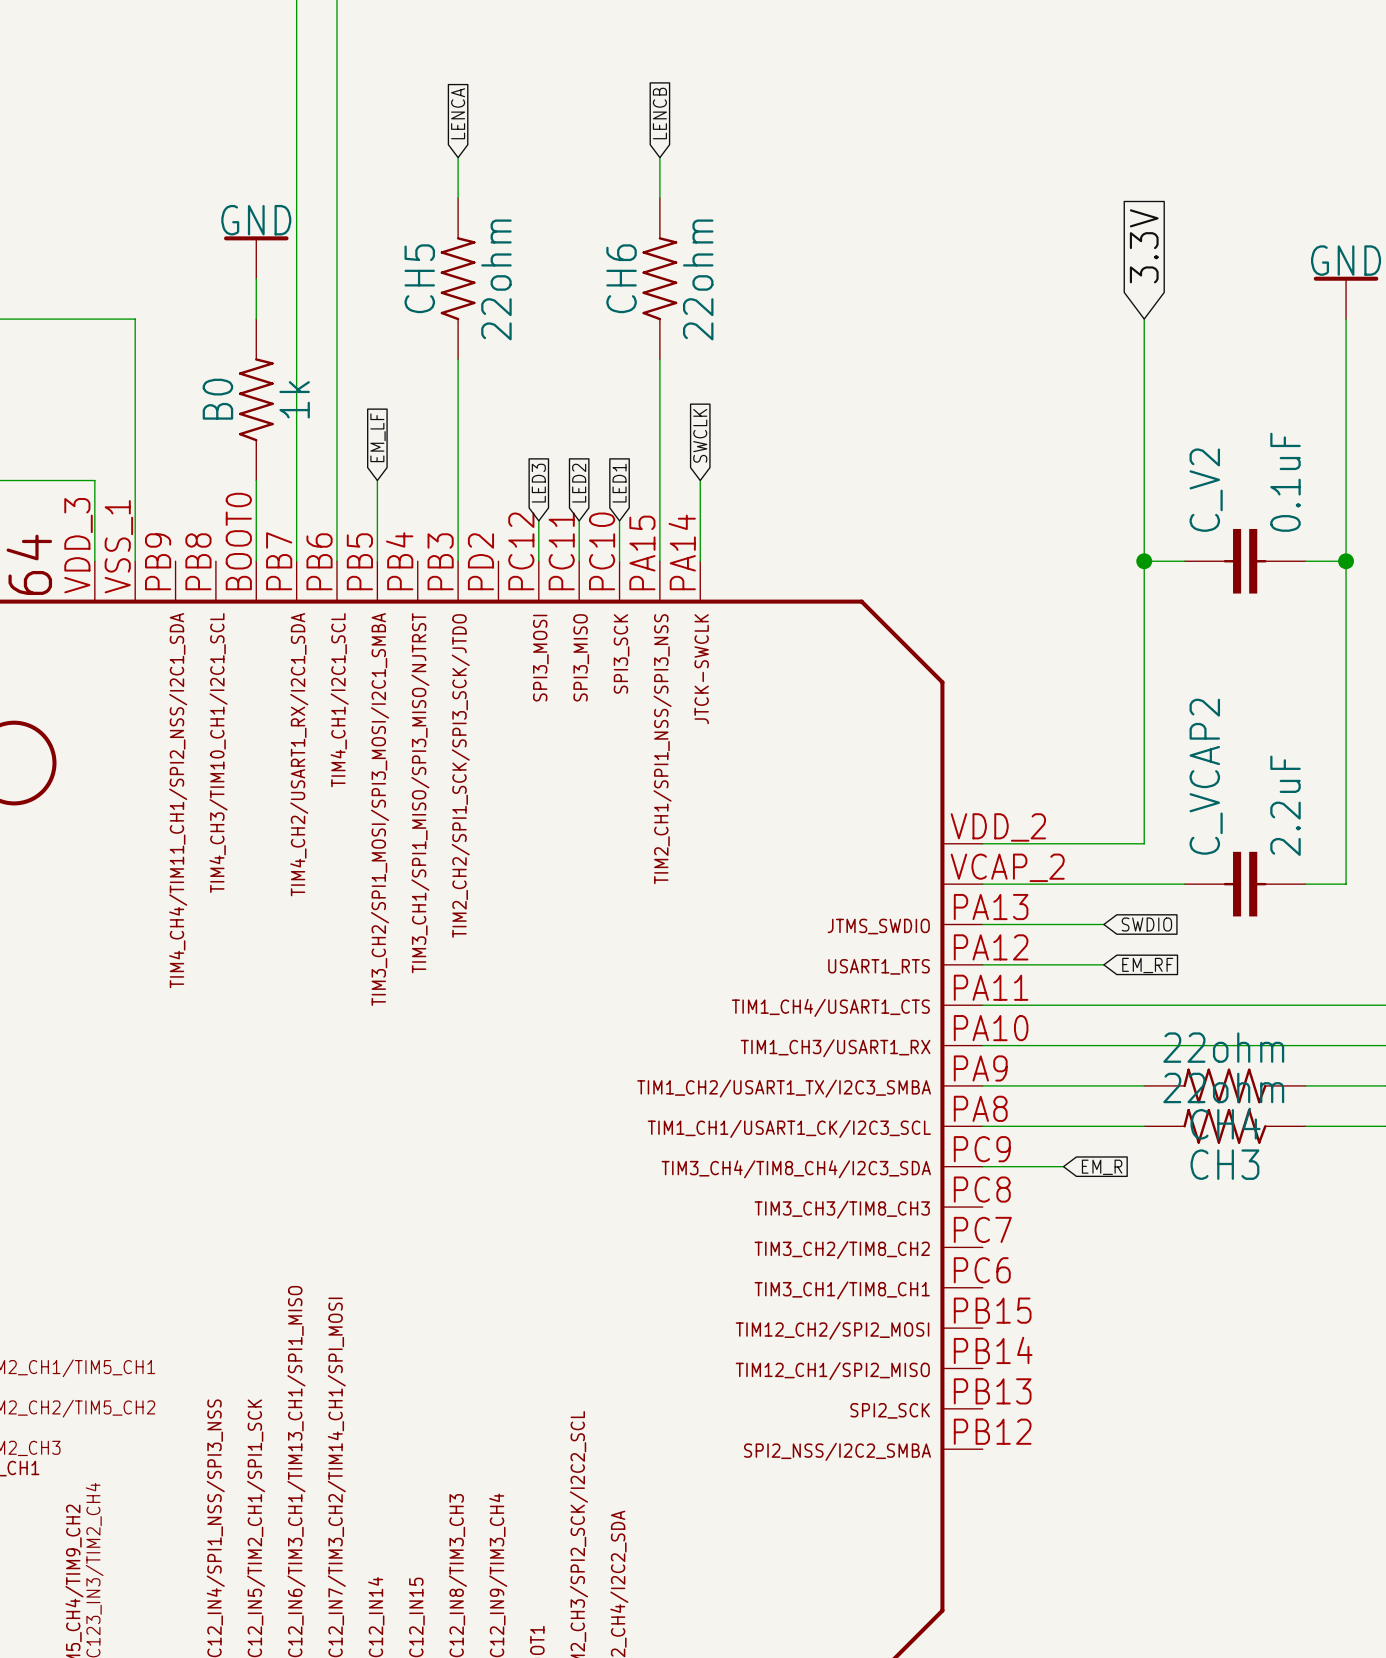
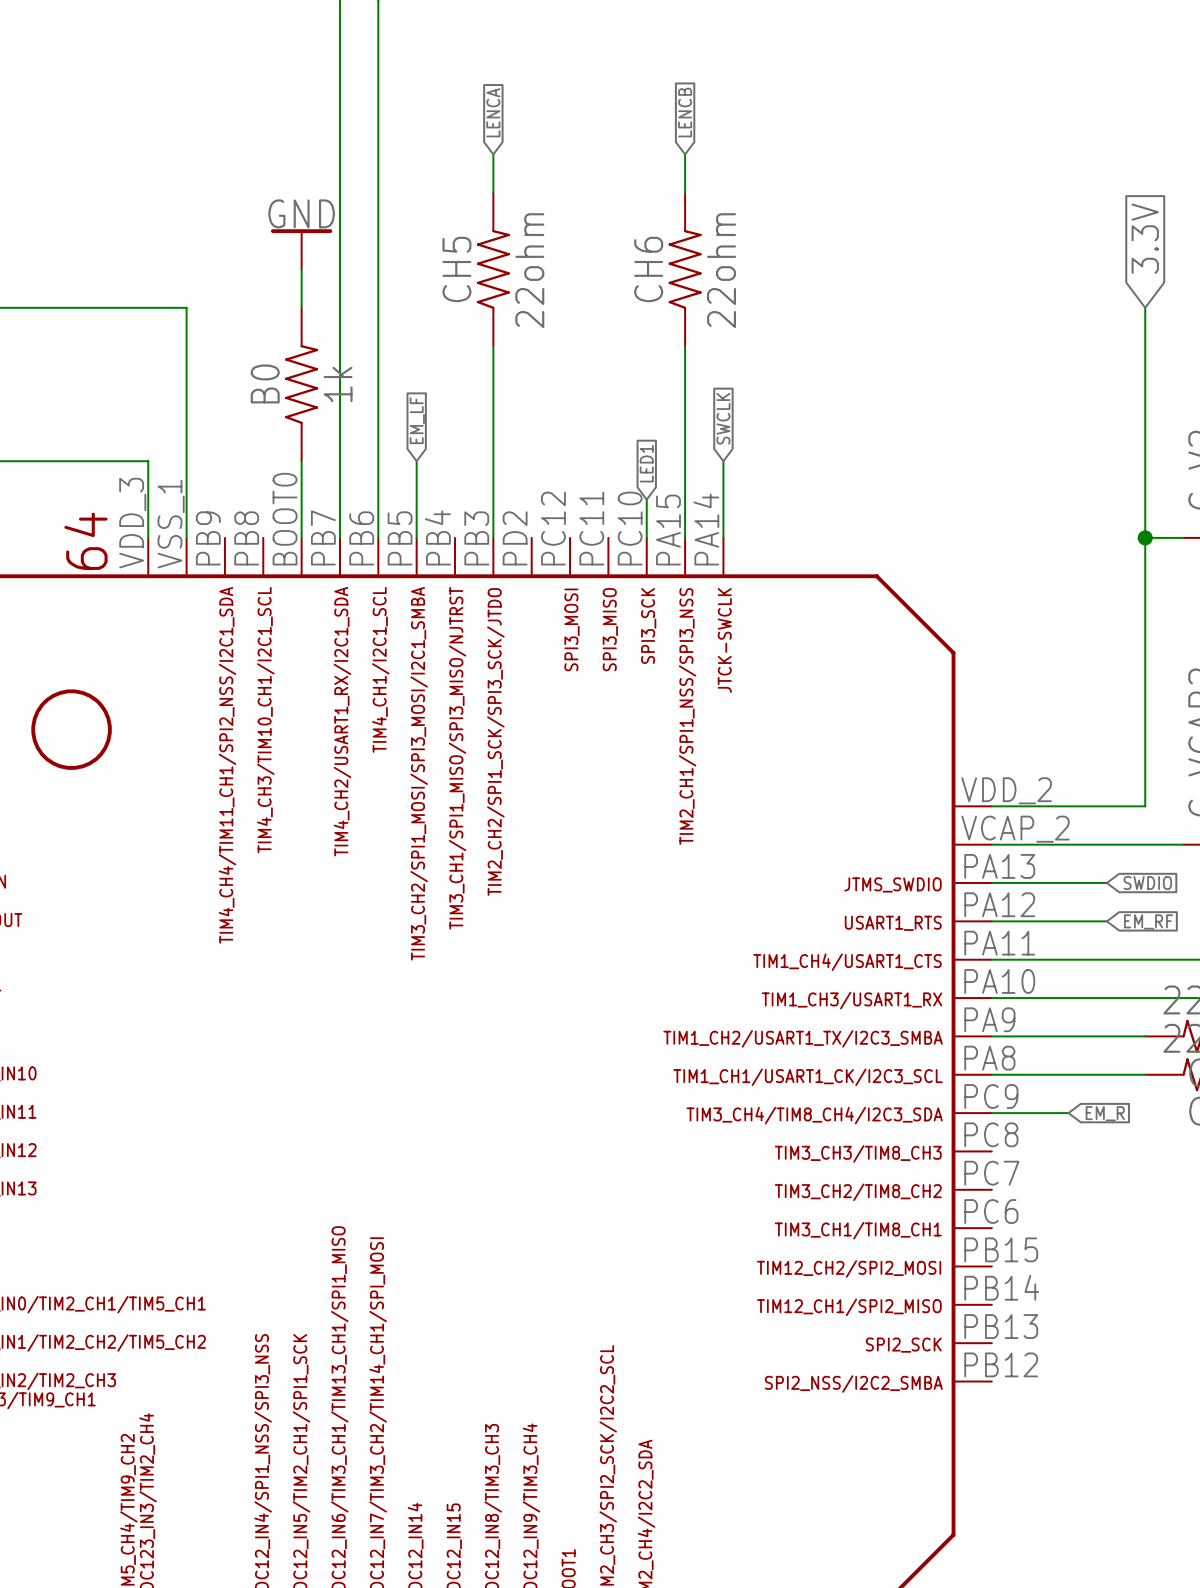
global label: LED3 (538, 483) -> none
global label: LED2 (579, 483) -> none
wire: (538, 520) (538, 561) -> none
wire: (579, 520) (579, 561) -> none

